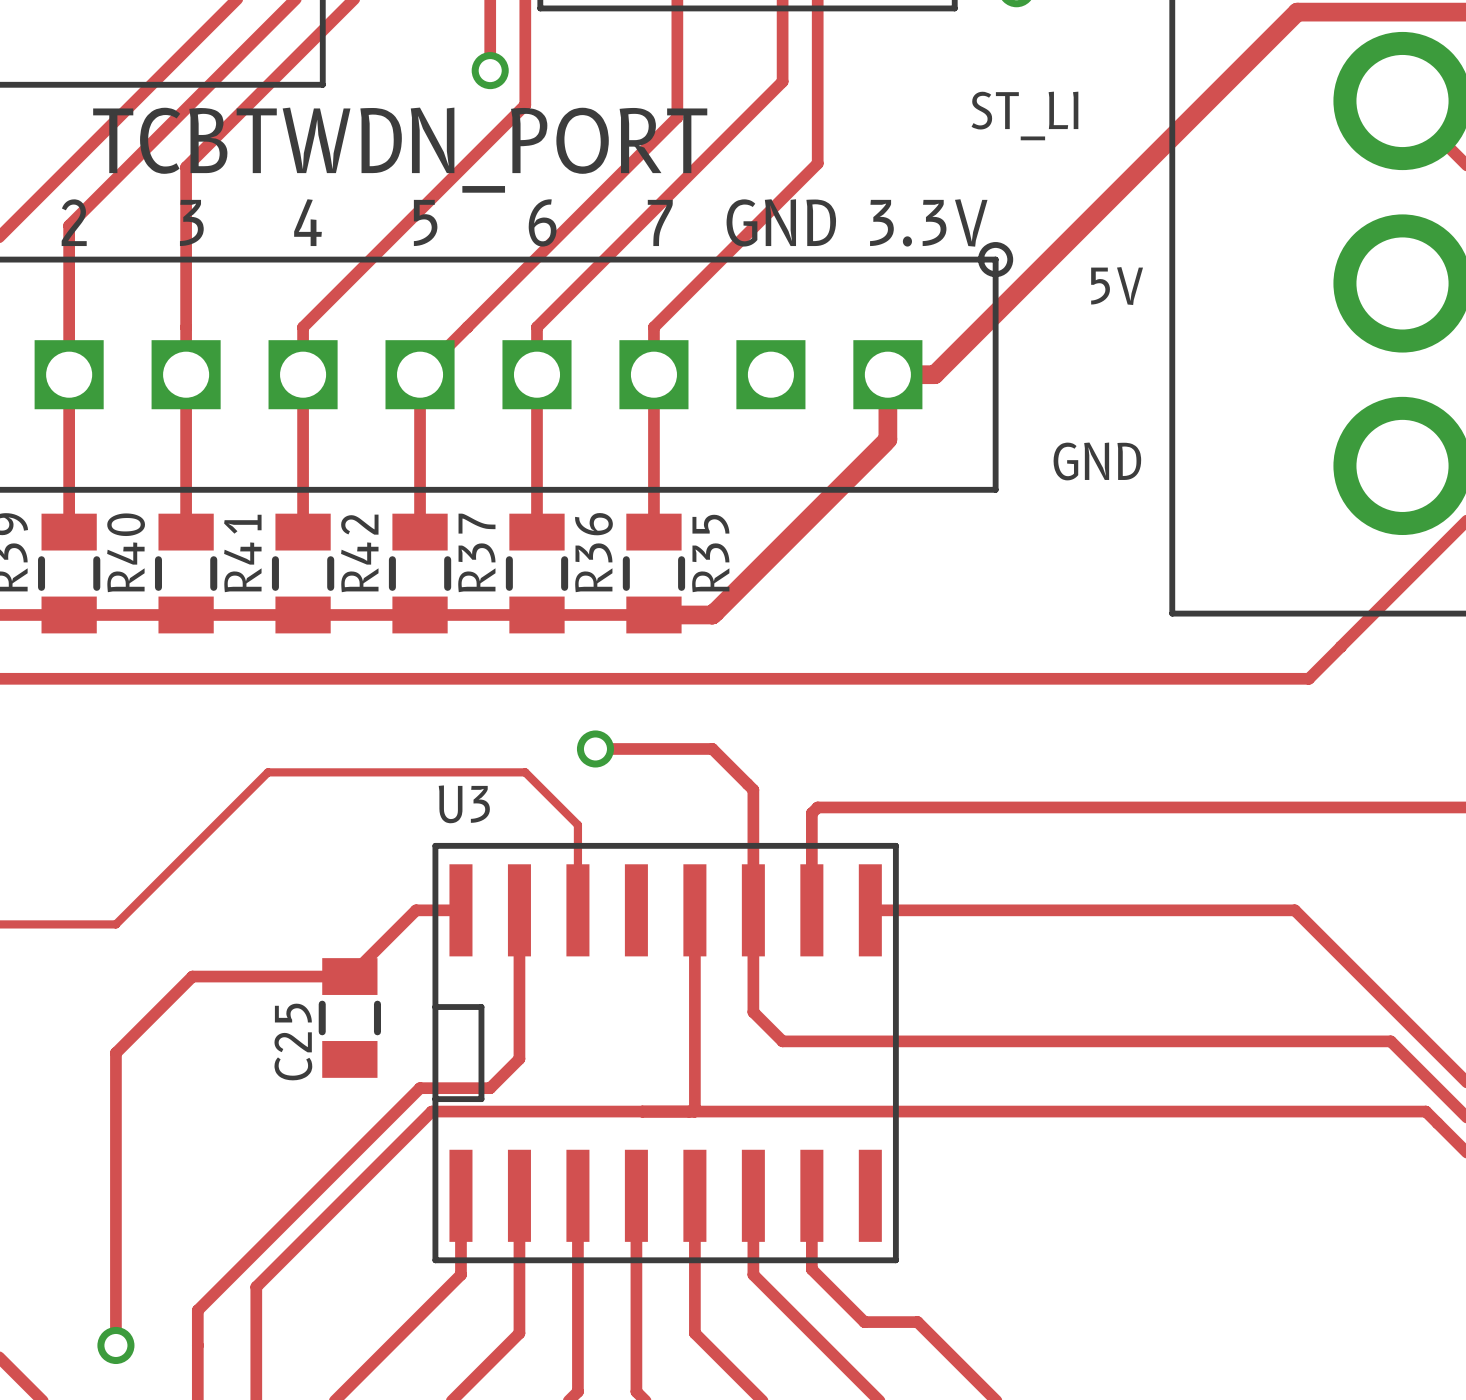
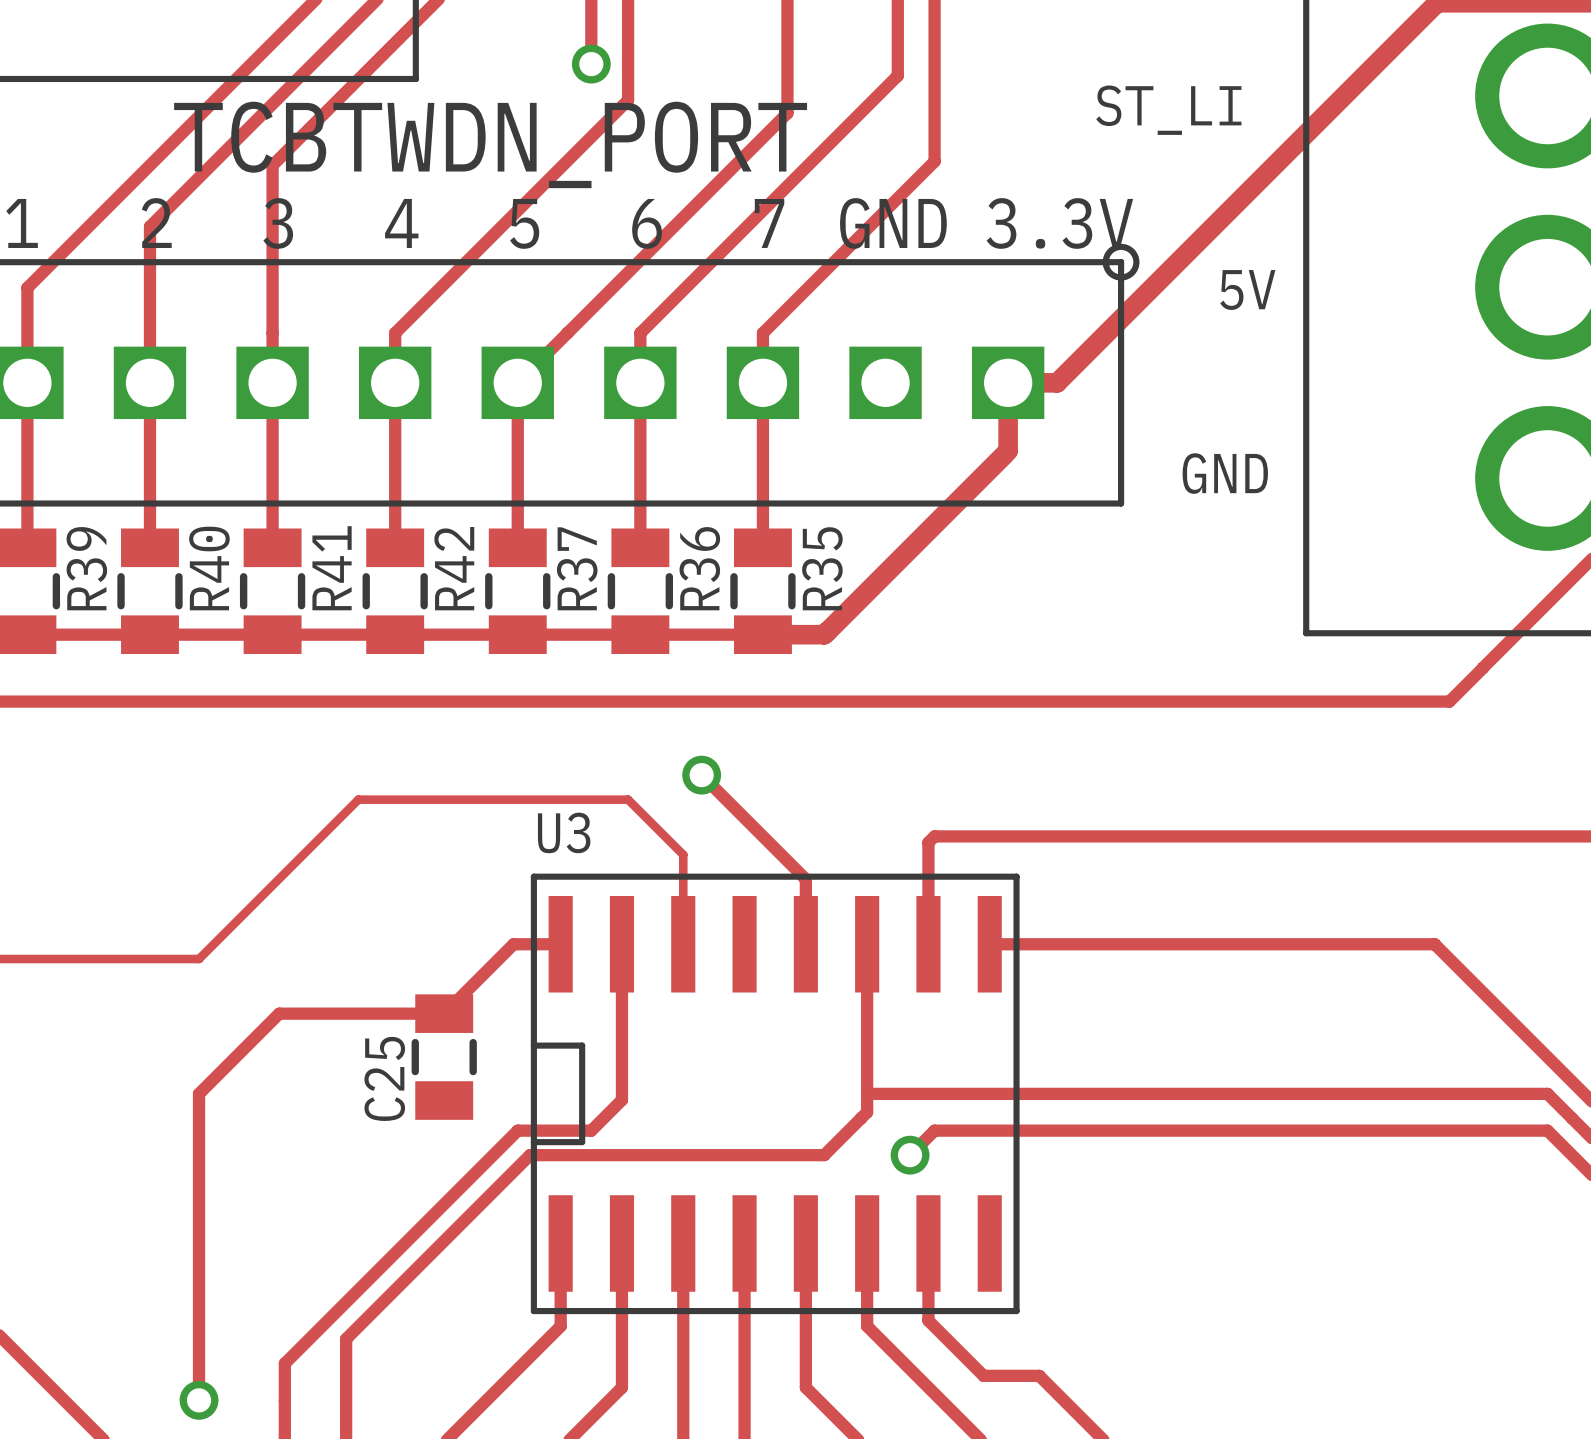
track: (595, 748) (712, 748) (753, 789) (753, 910) -> (701, 775) (805, 879) (805, 944)
track: (694, 910) (694, 1111) -> none
track: (753, 1012) (782, 1041) (1390, 1041) (1402, 1053) -> (867, 1093) (1547, 1093)
track: none -> (867, 1050) (867, 1112) (824, 1155)
track: (712, 1111) (1425, 1111) -> (910, 1155) (934, 1130) (1547, 1130) (1572, 1155)
via: none -> (910, 1155)

